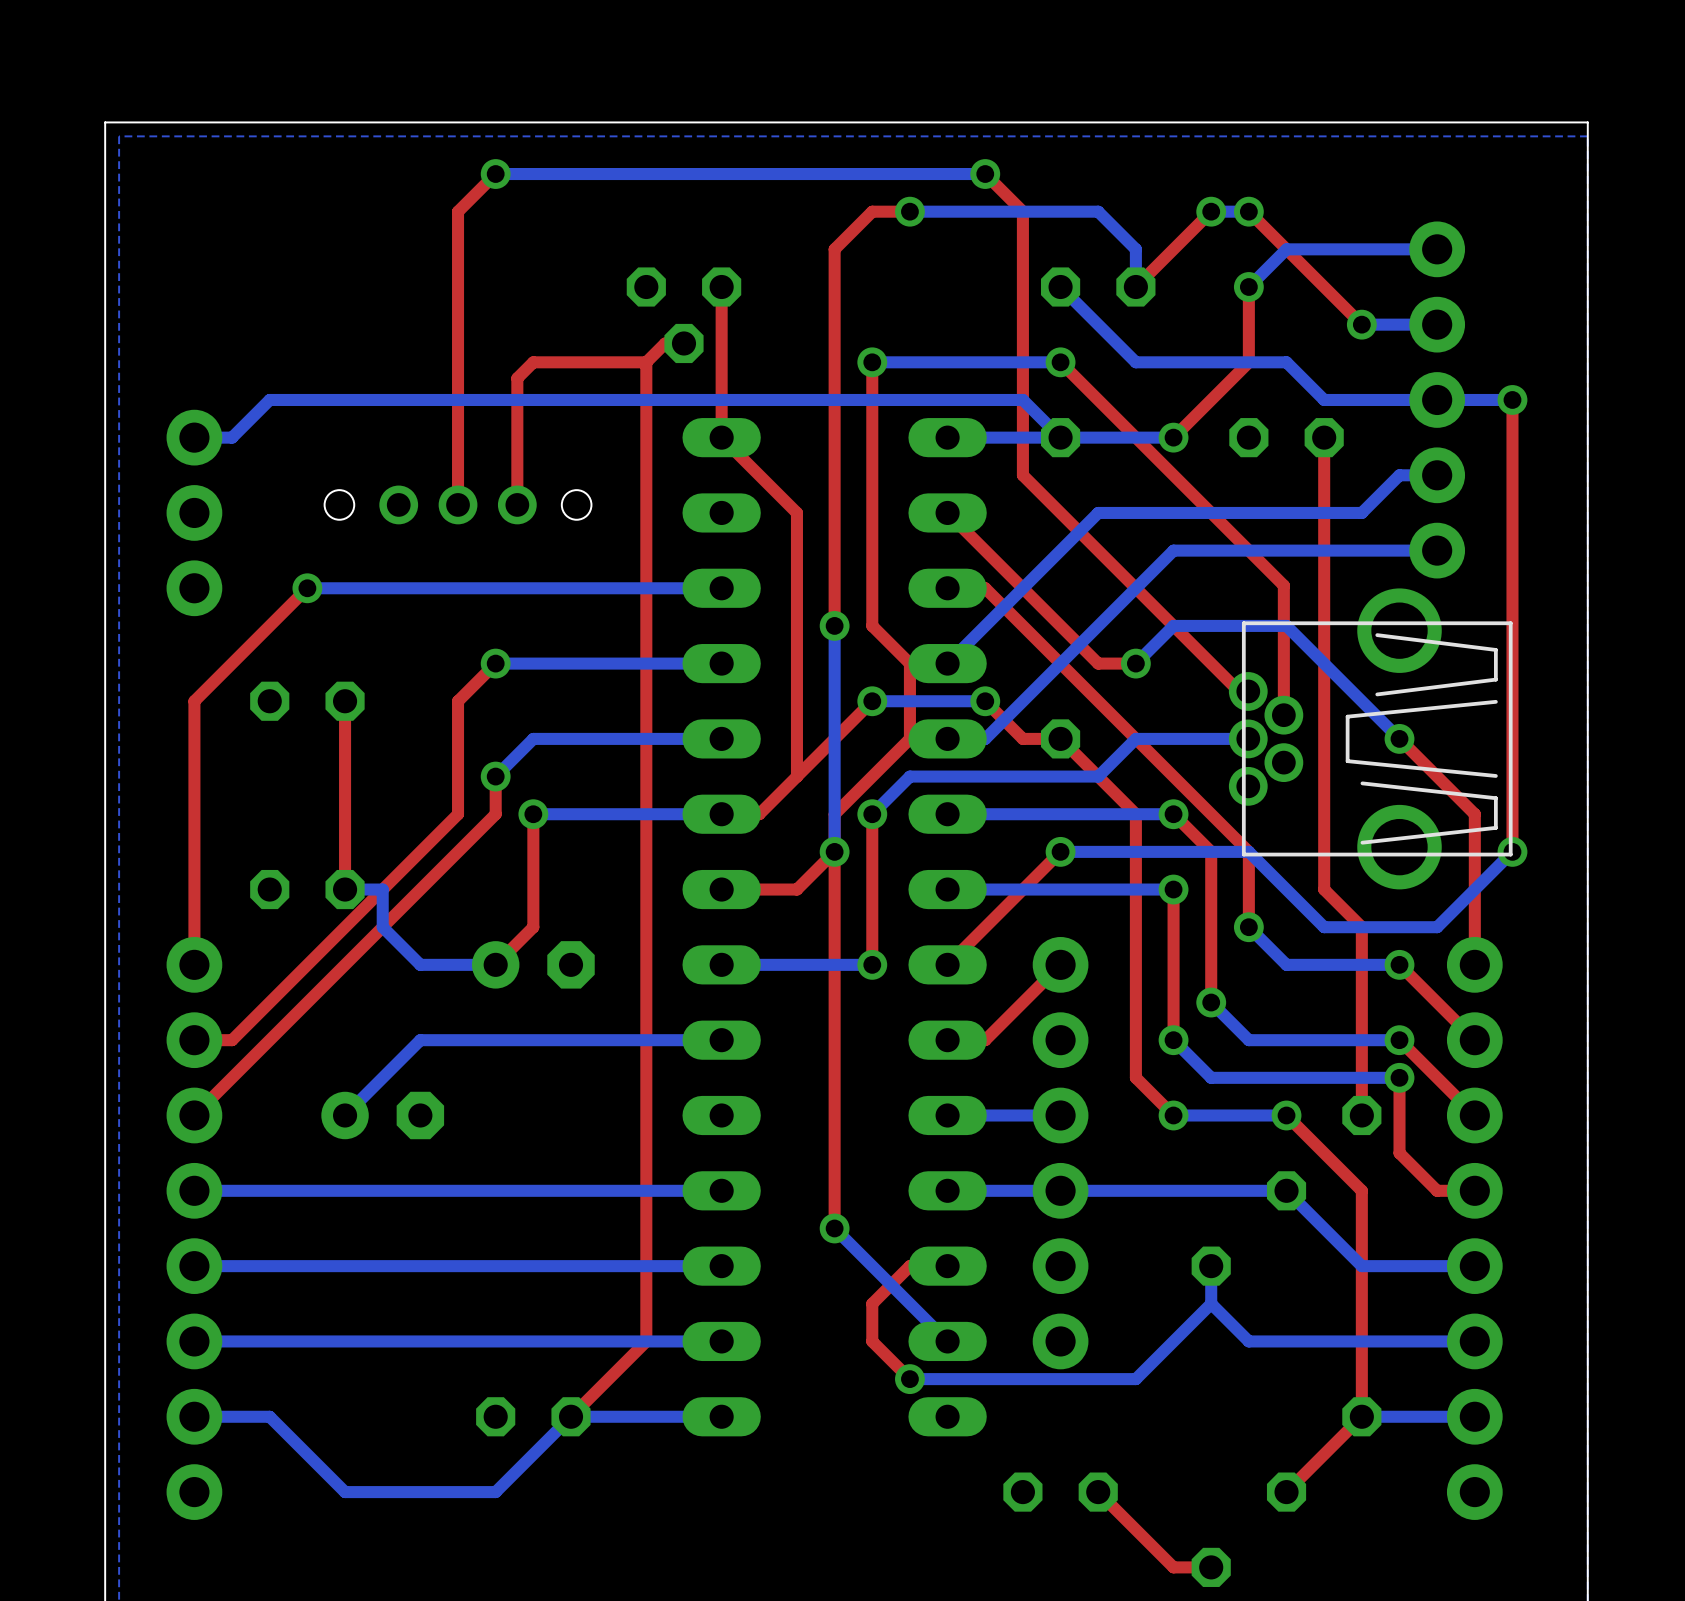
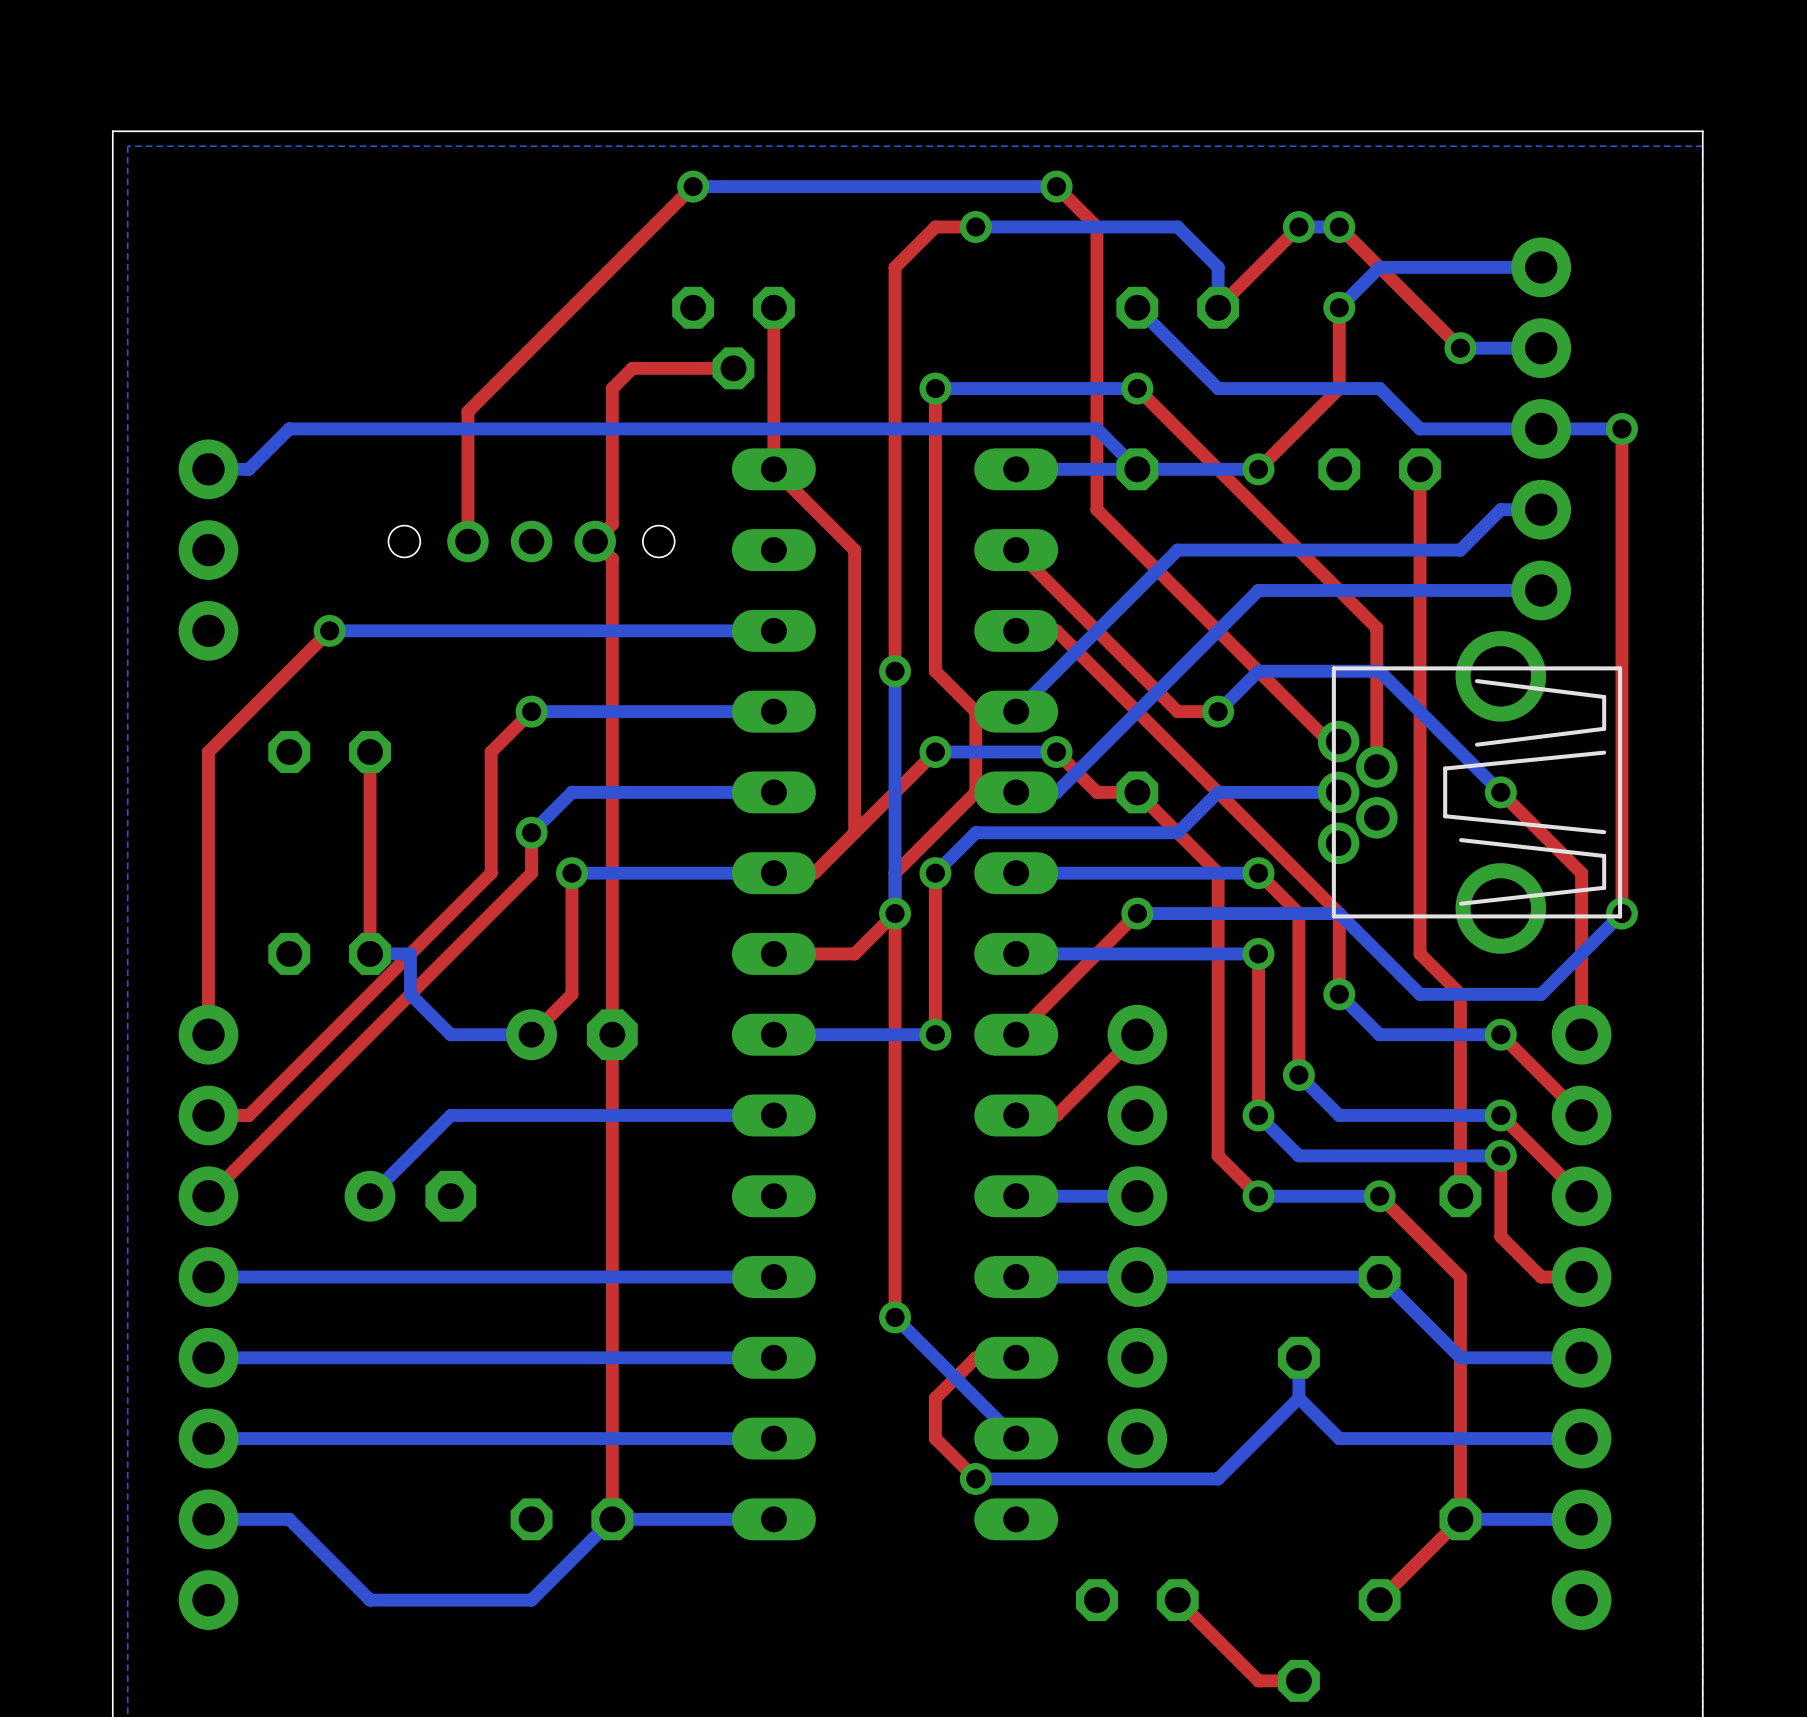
top track: (495, 174) (458, 211) (458, 504) -> none
via position: (495, 174) -> (693, 186)
top track: none -> (693, 186) (467, 411) (467, 541)
bottom track: (646, 174) (495, 174) -> none
top track: (665, 343) (646, 362) -> none
top track: (646, 362) (646, 1341) (571, 1416) -> (713, 368) (632, 368) (612, 388) (612, 524) (595, 541) (612, 558) (612, 1519)
top track: (646, 362) (533, 362) (517, 378) (517, 504) -> none
part position: (458, 504) -> (531, 541)

